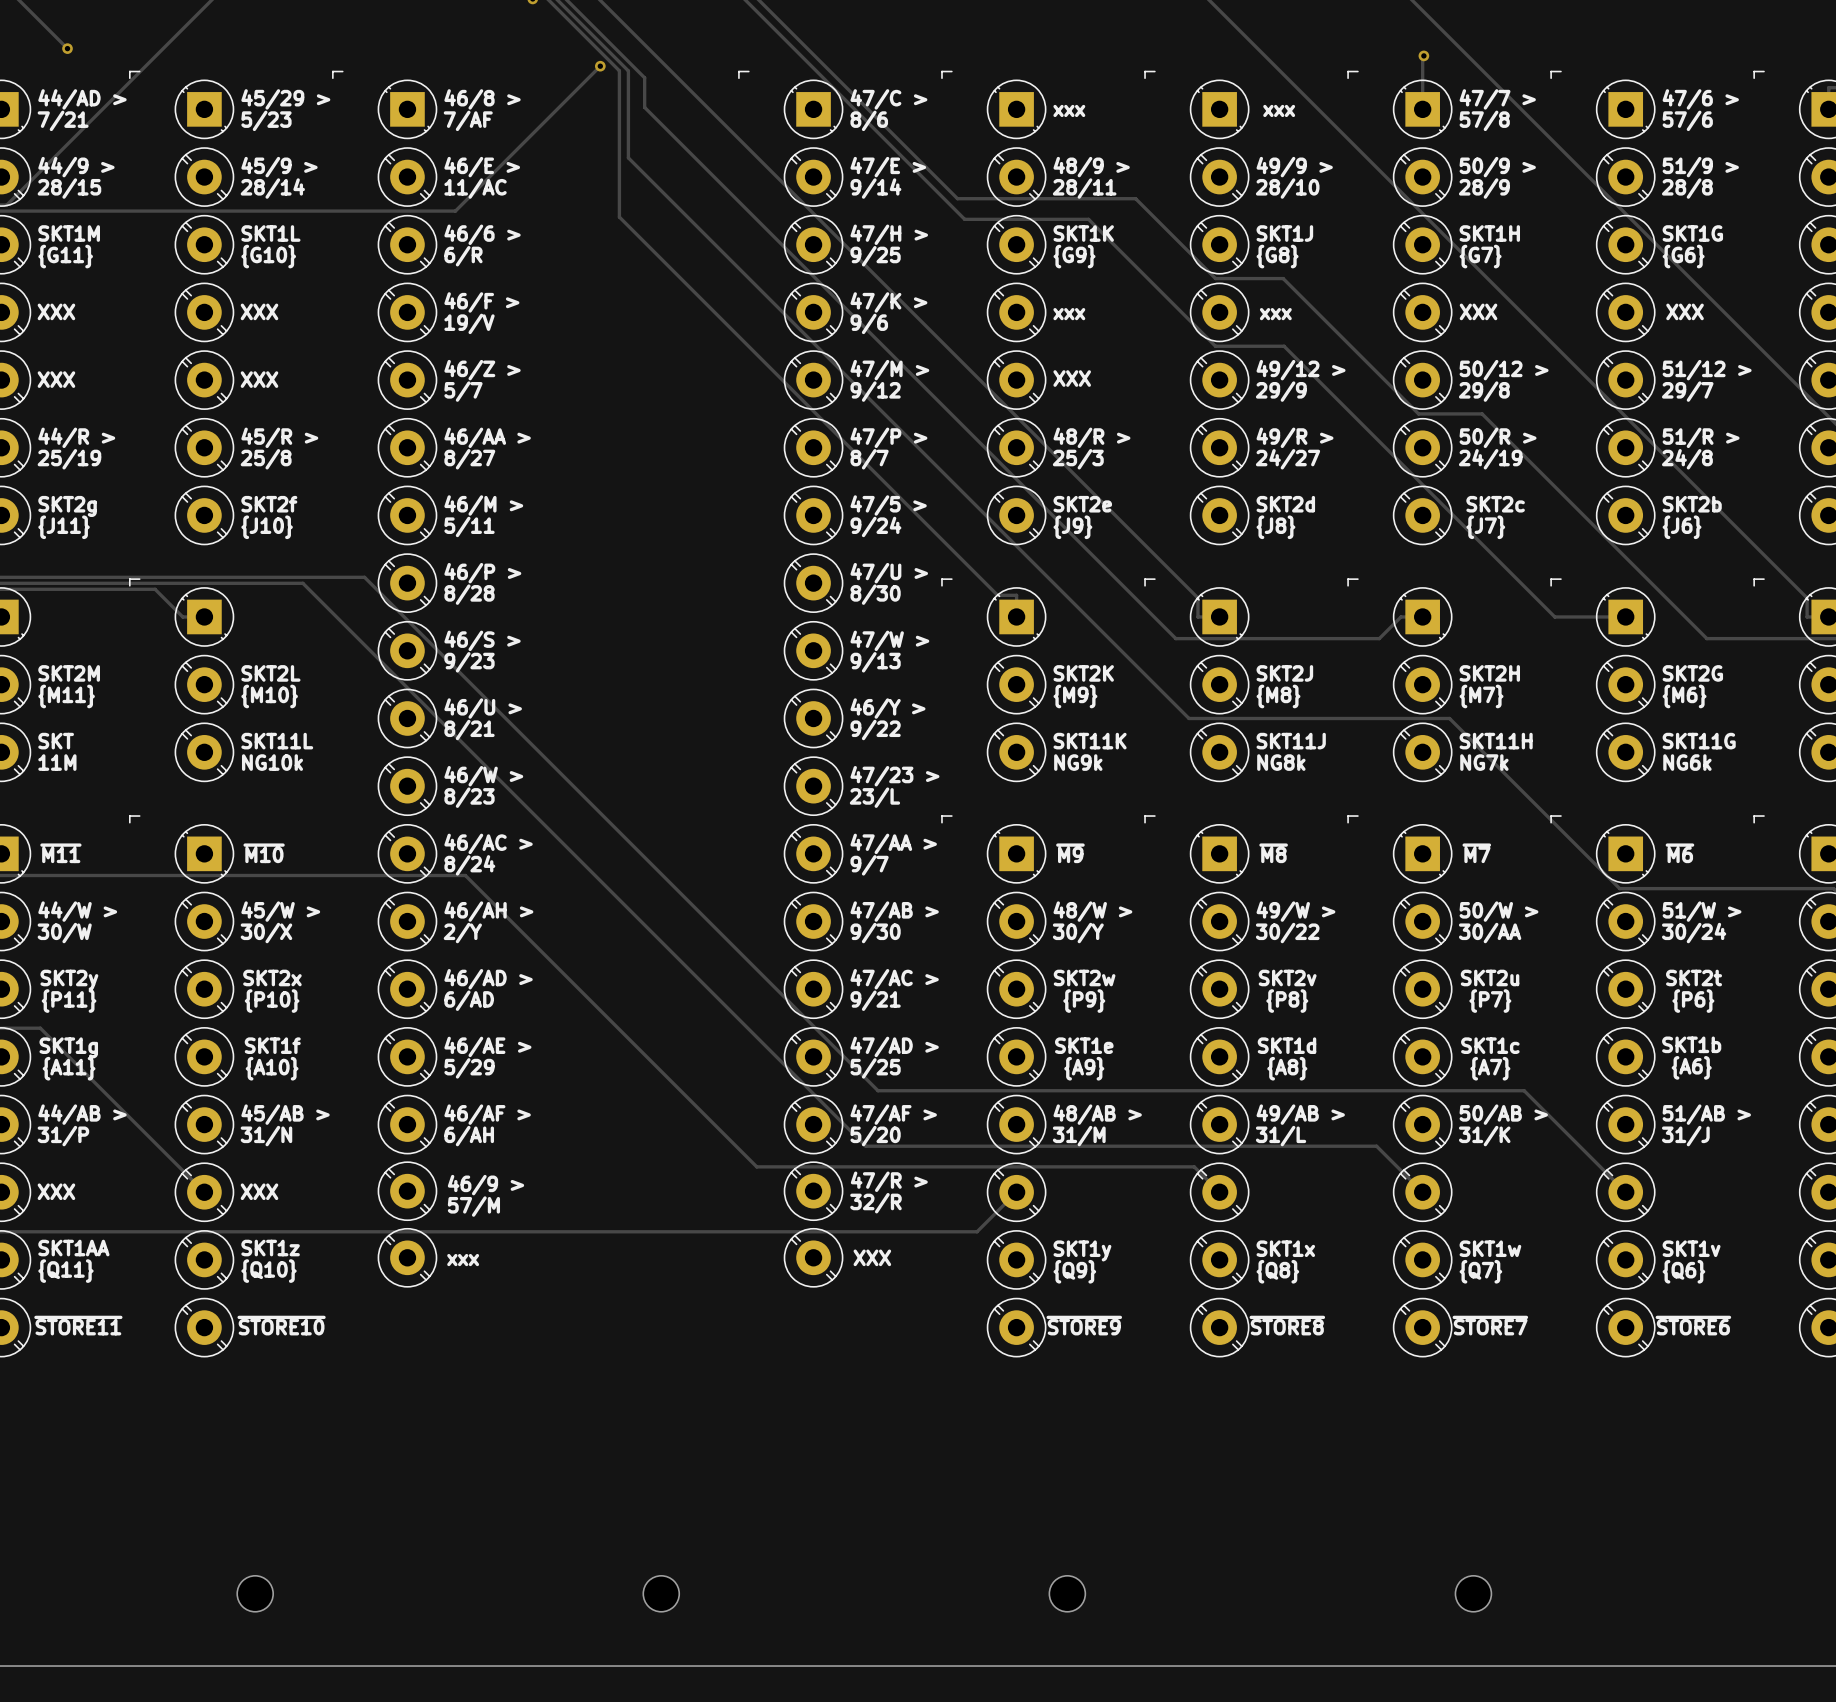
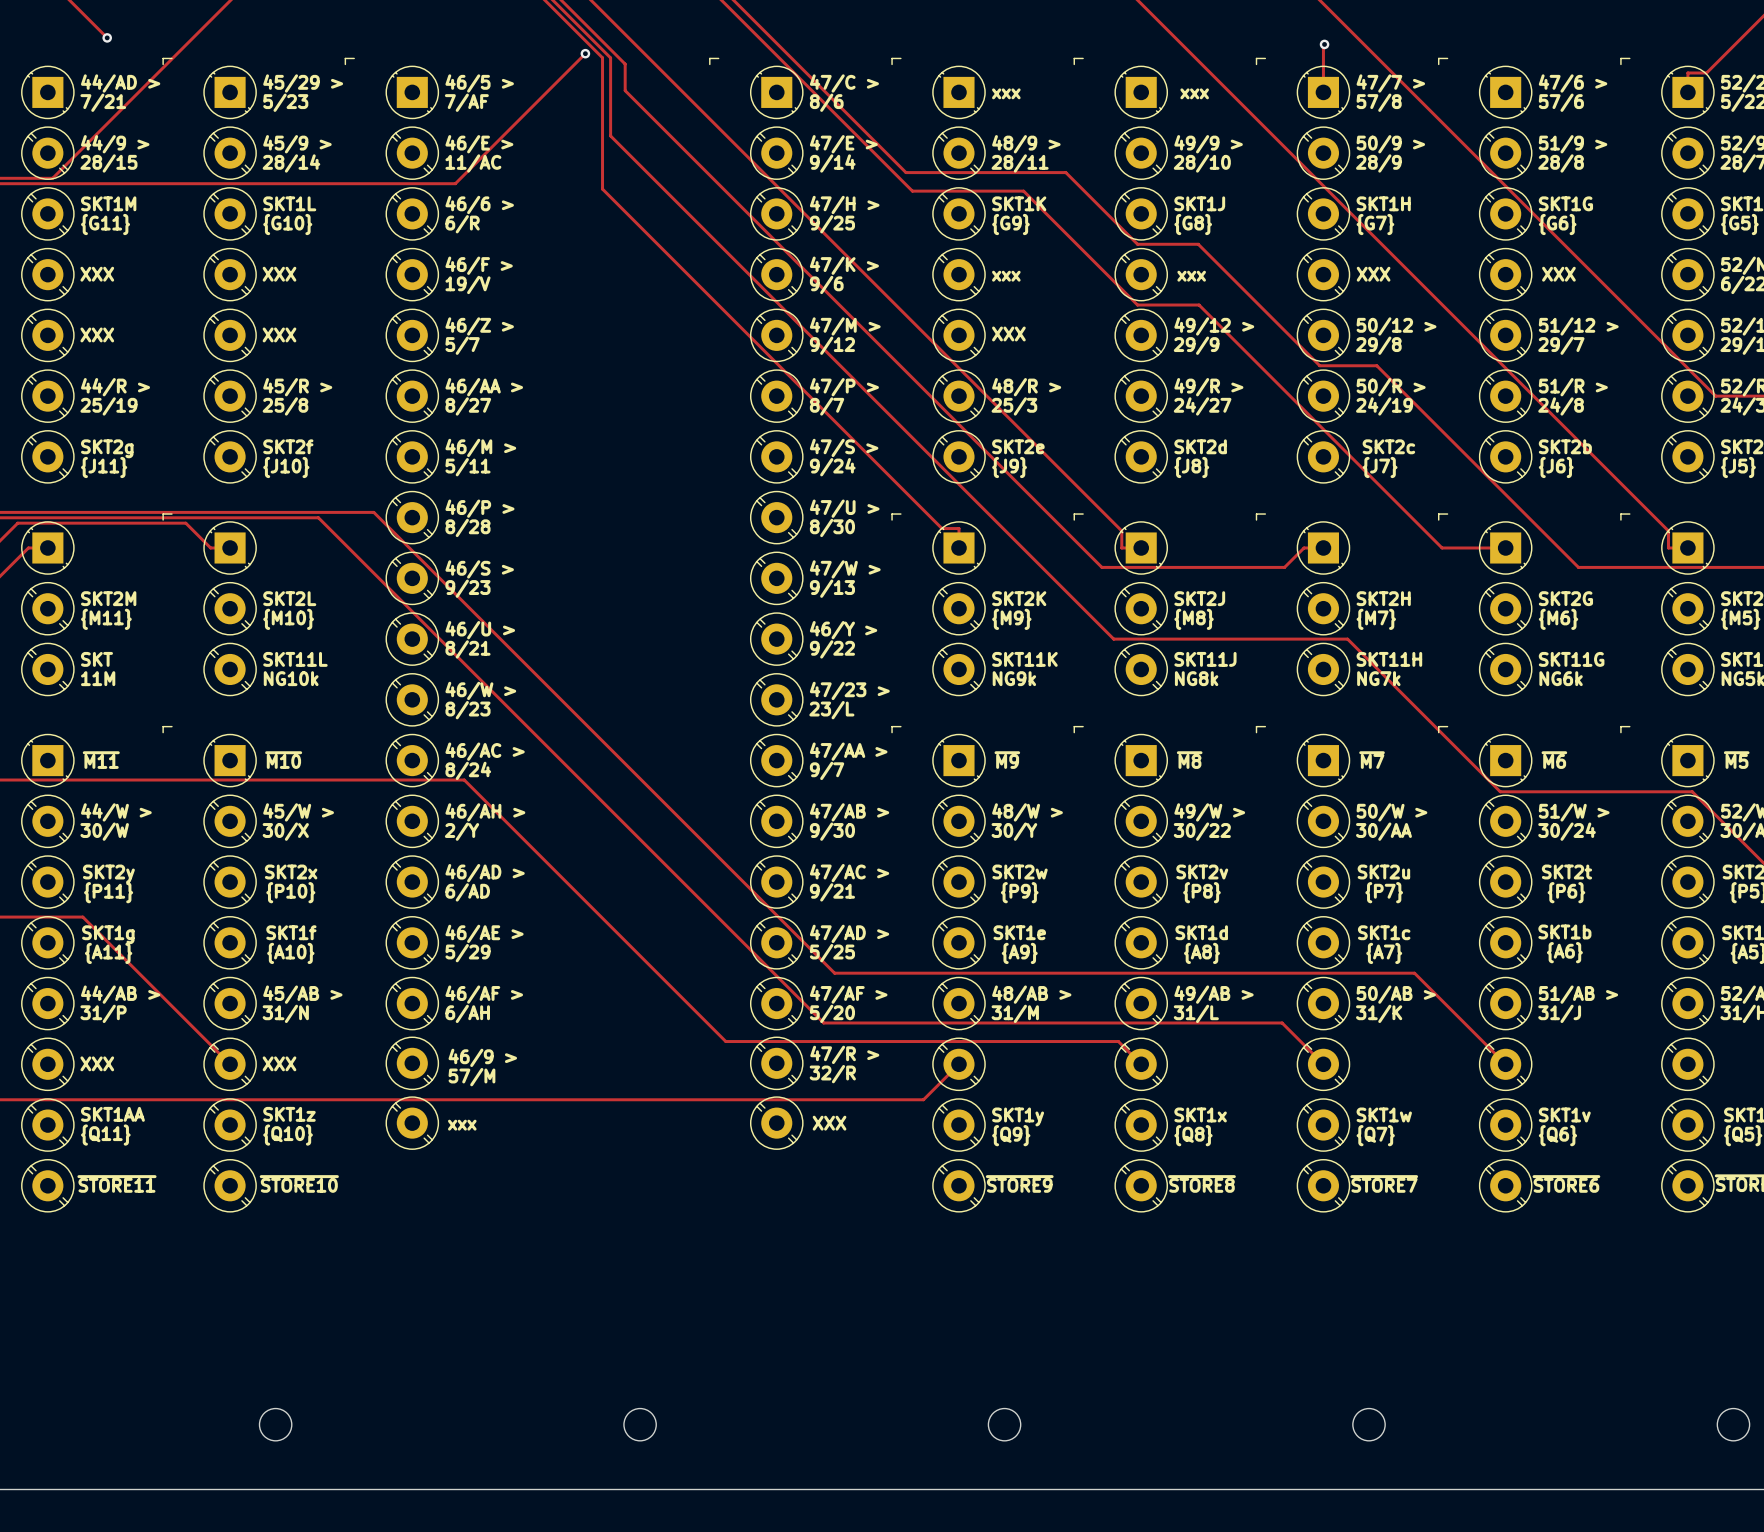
text: 46/8 > (482, 99) -> 46/5 > (479, 83)
text: 47/5 > (888, 505) -> 47/S > (844, 447)

